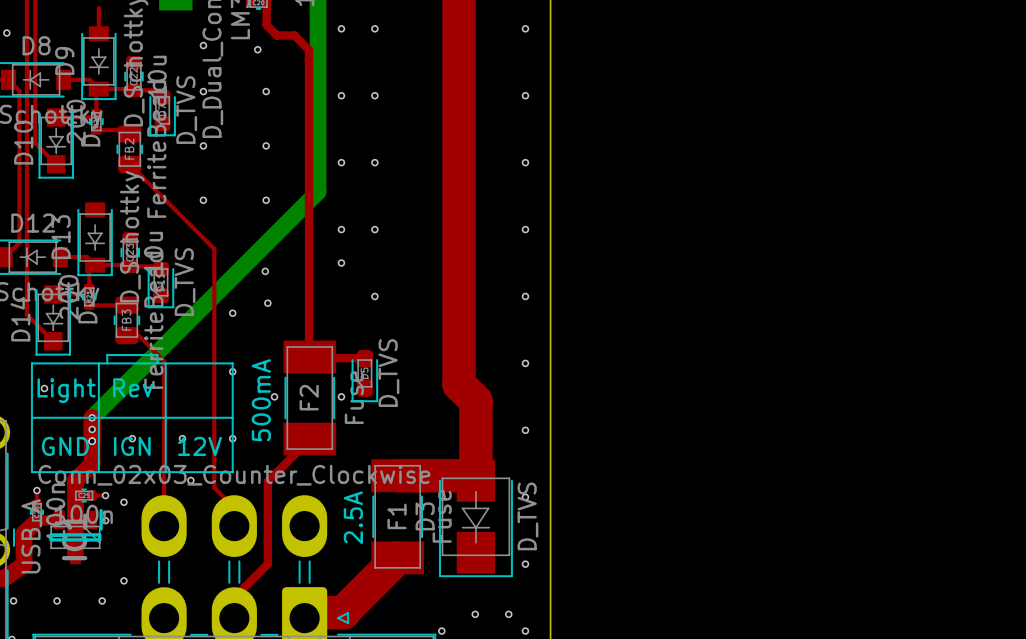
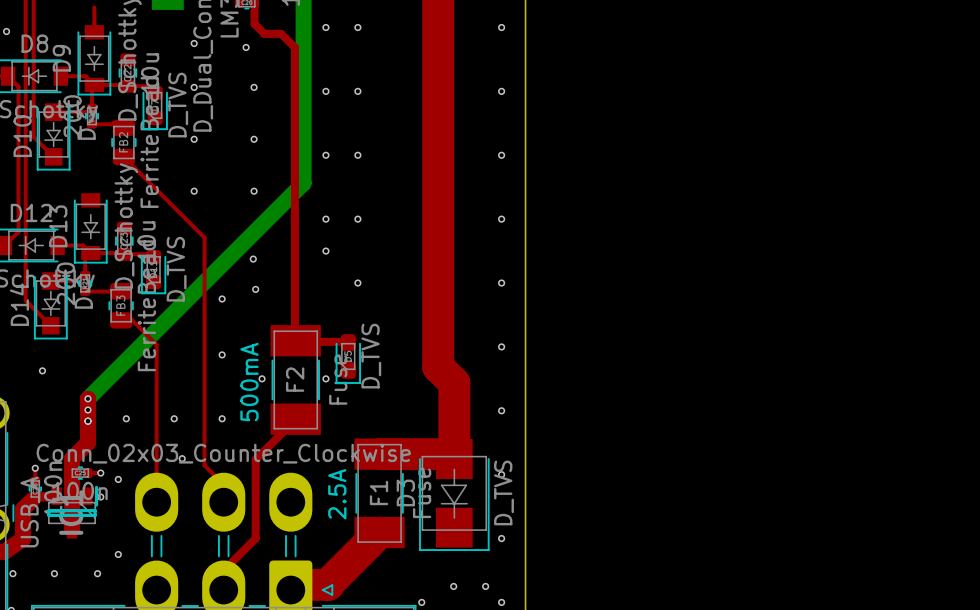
line: (31, 363) (232, 363) (232, 472) (31, 472) (31, 363) -> none
line: (98, 363) (98, 472) -> none
line: (107, 363) (107, 355) (157, 355) (157, 363) -> none
line: (165, 363) (165, 472) -> none
text: Rev (133, 387) -> none
text: Light (66, 390) -> none
line: (31, 417) (232, 417) -> none
text: GND (65, 446) -> none
text: IGN (132, 446) -> none
text: 12V (200, 446) -> none

